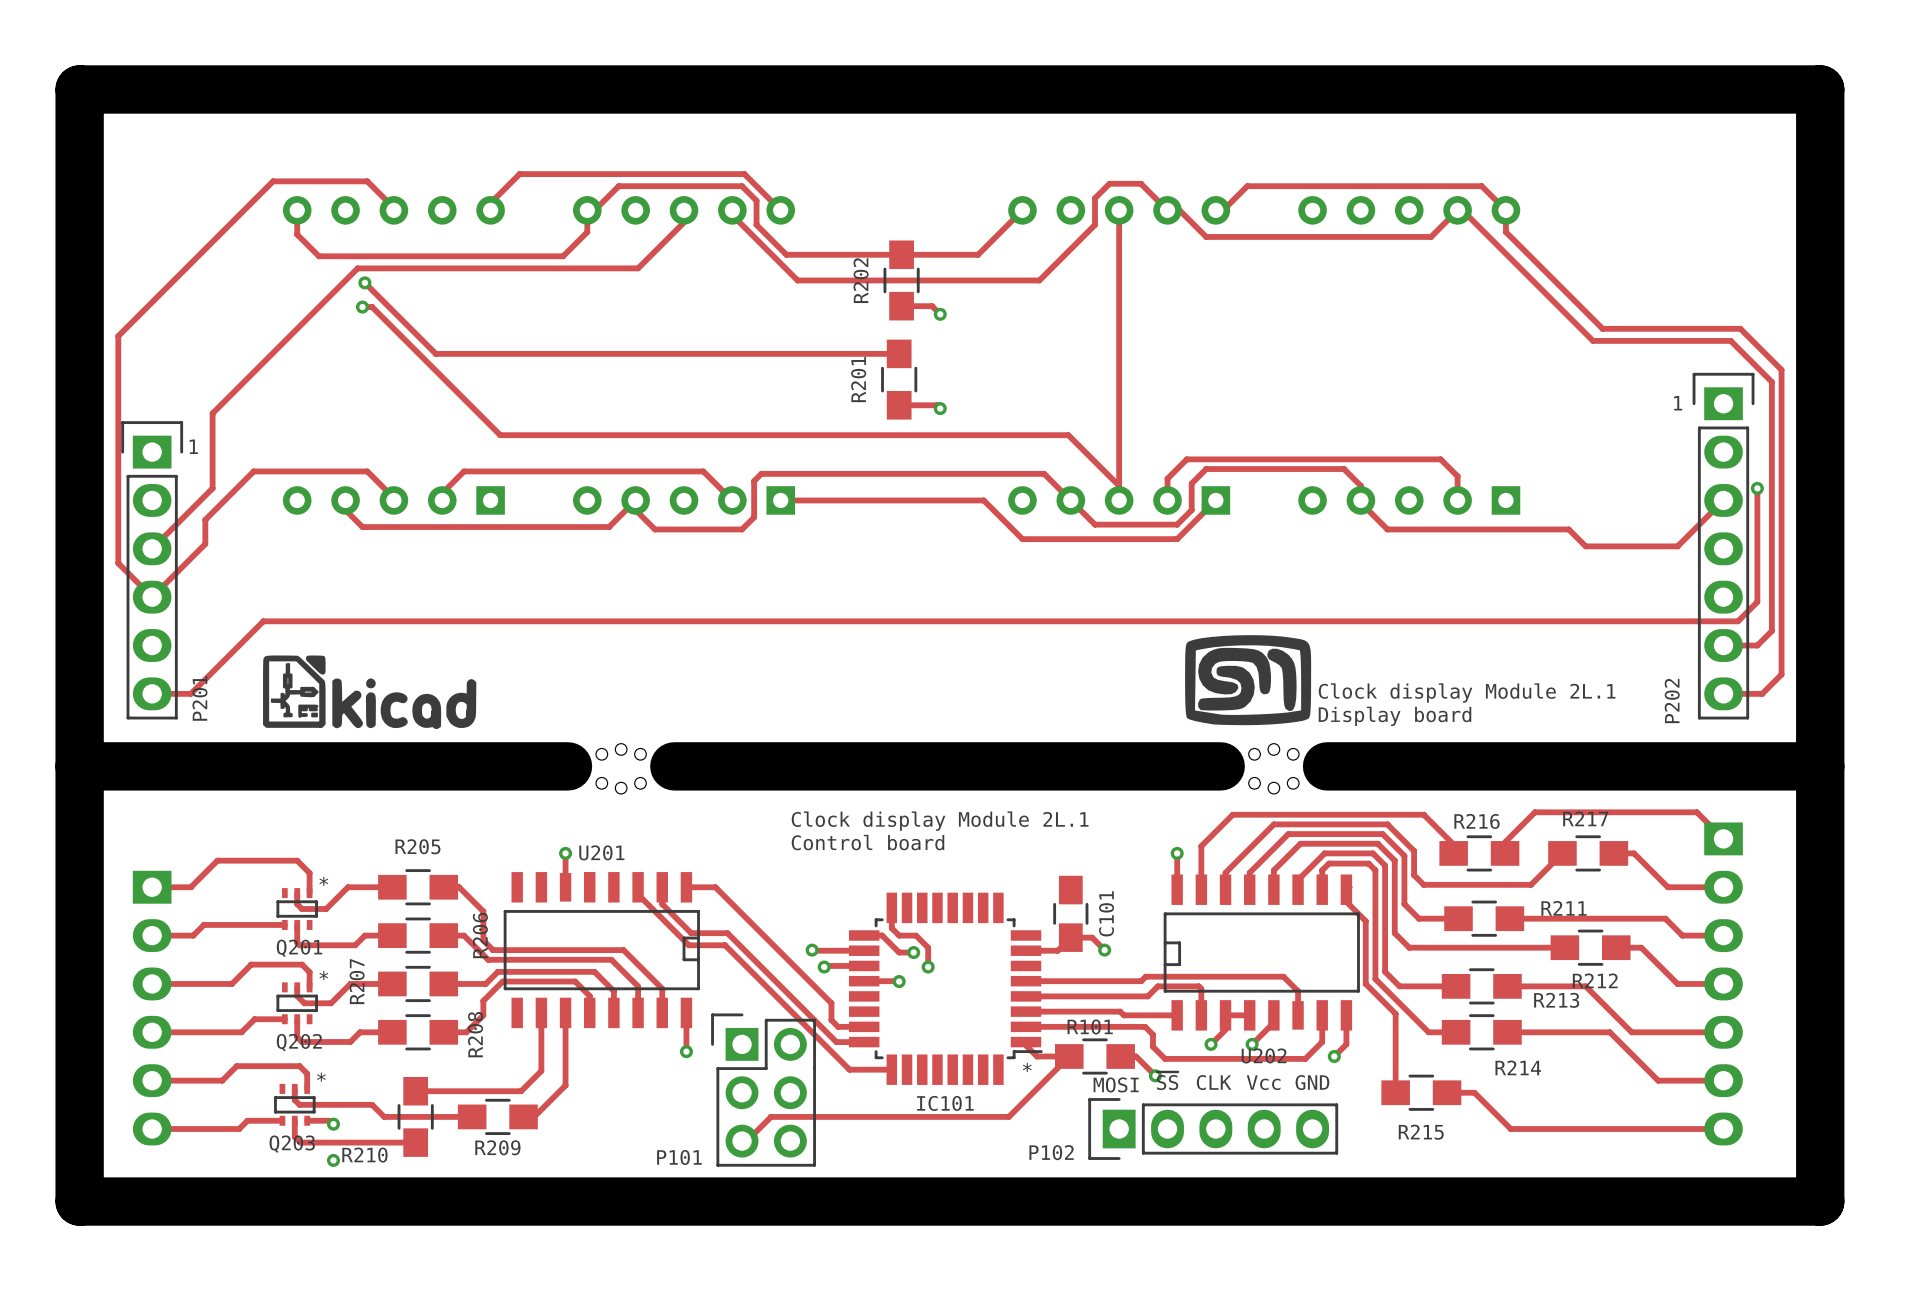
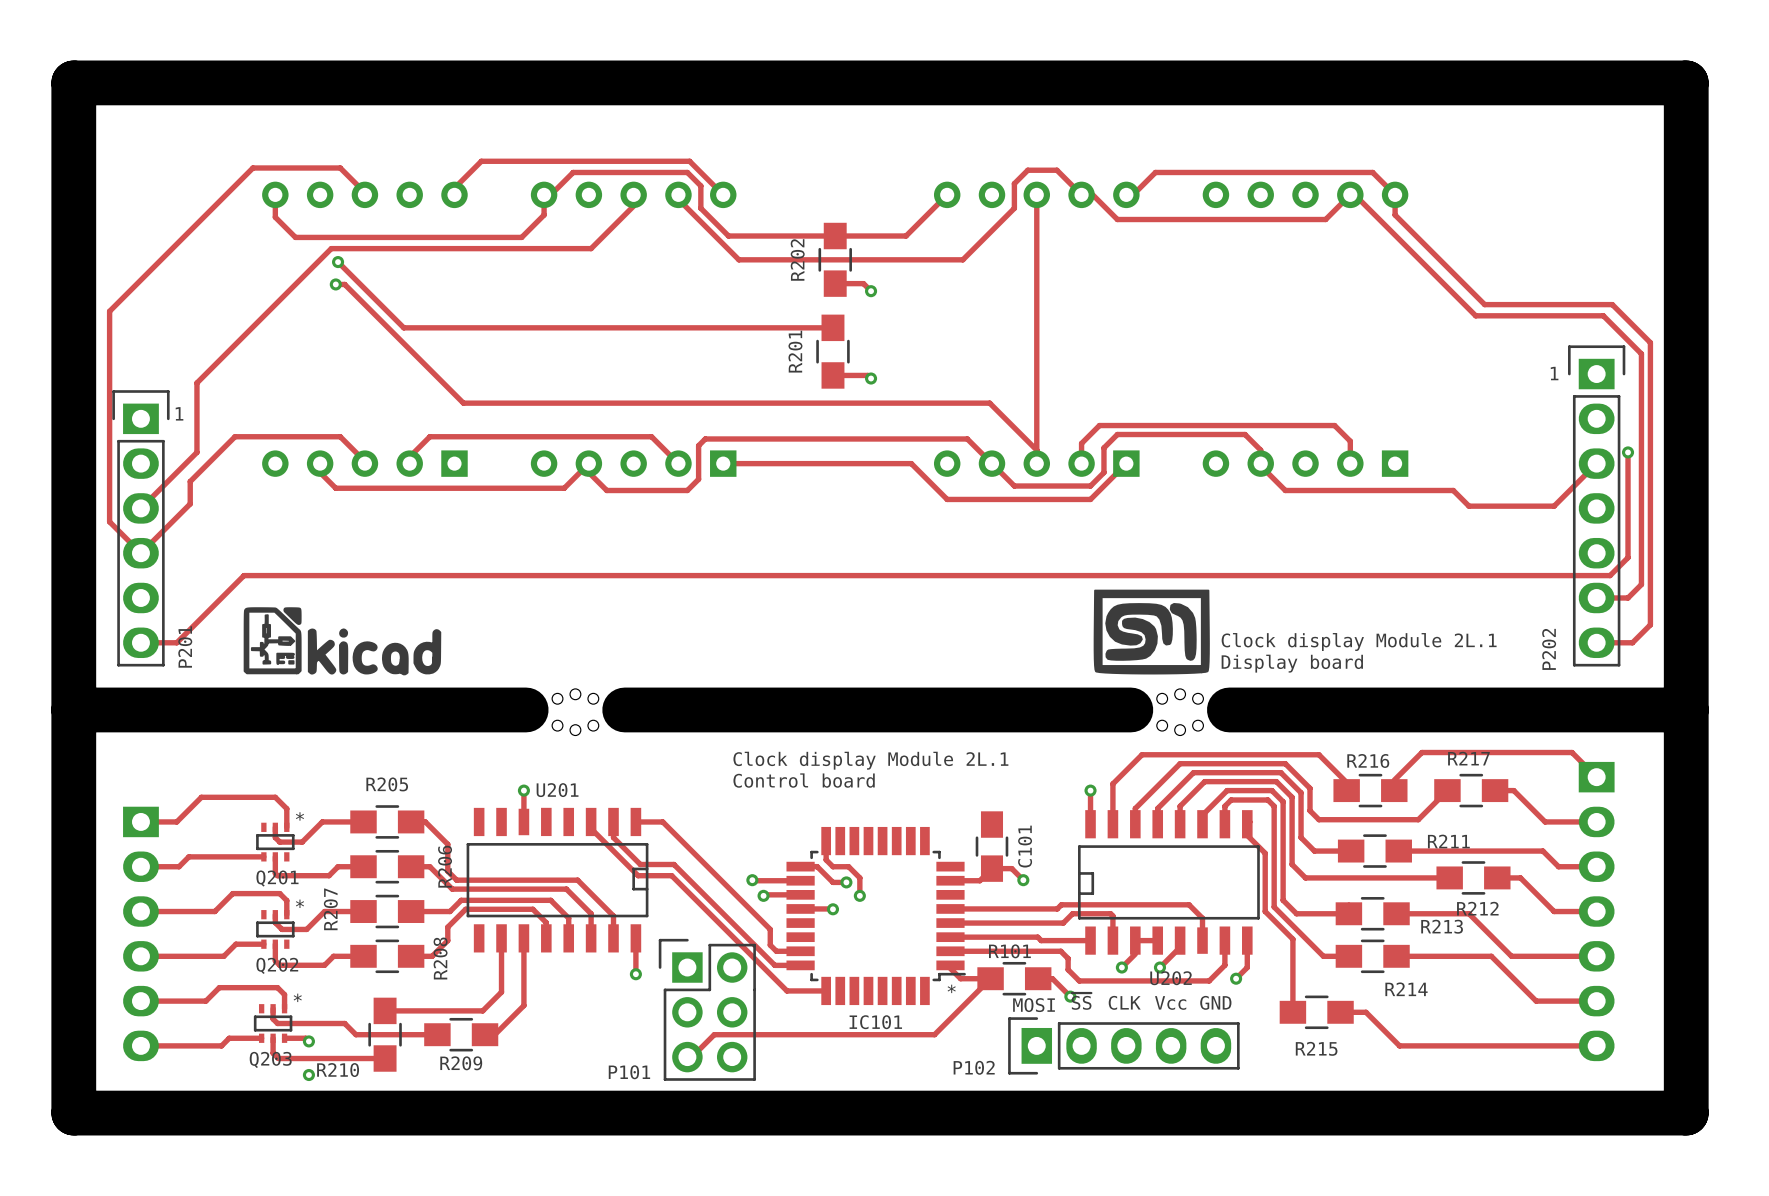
drawing shape: [1185, 635, 1312, 726] -> [1093, 589, 1210, 675]

